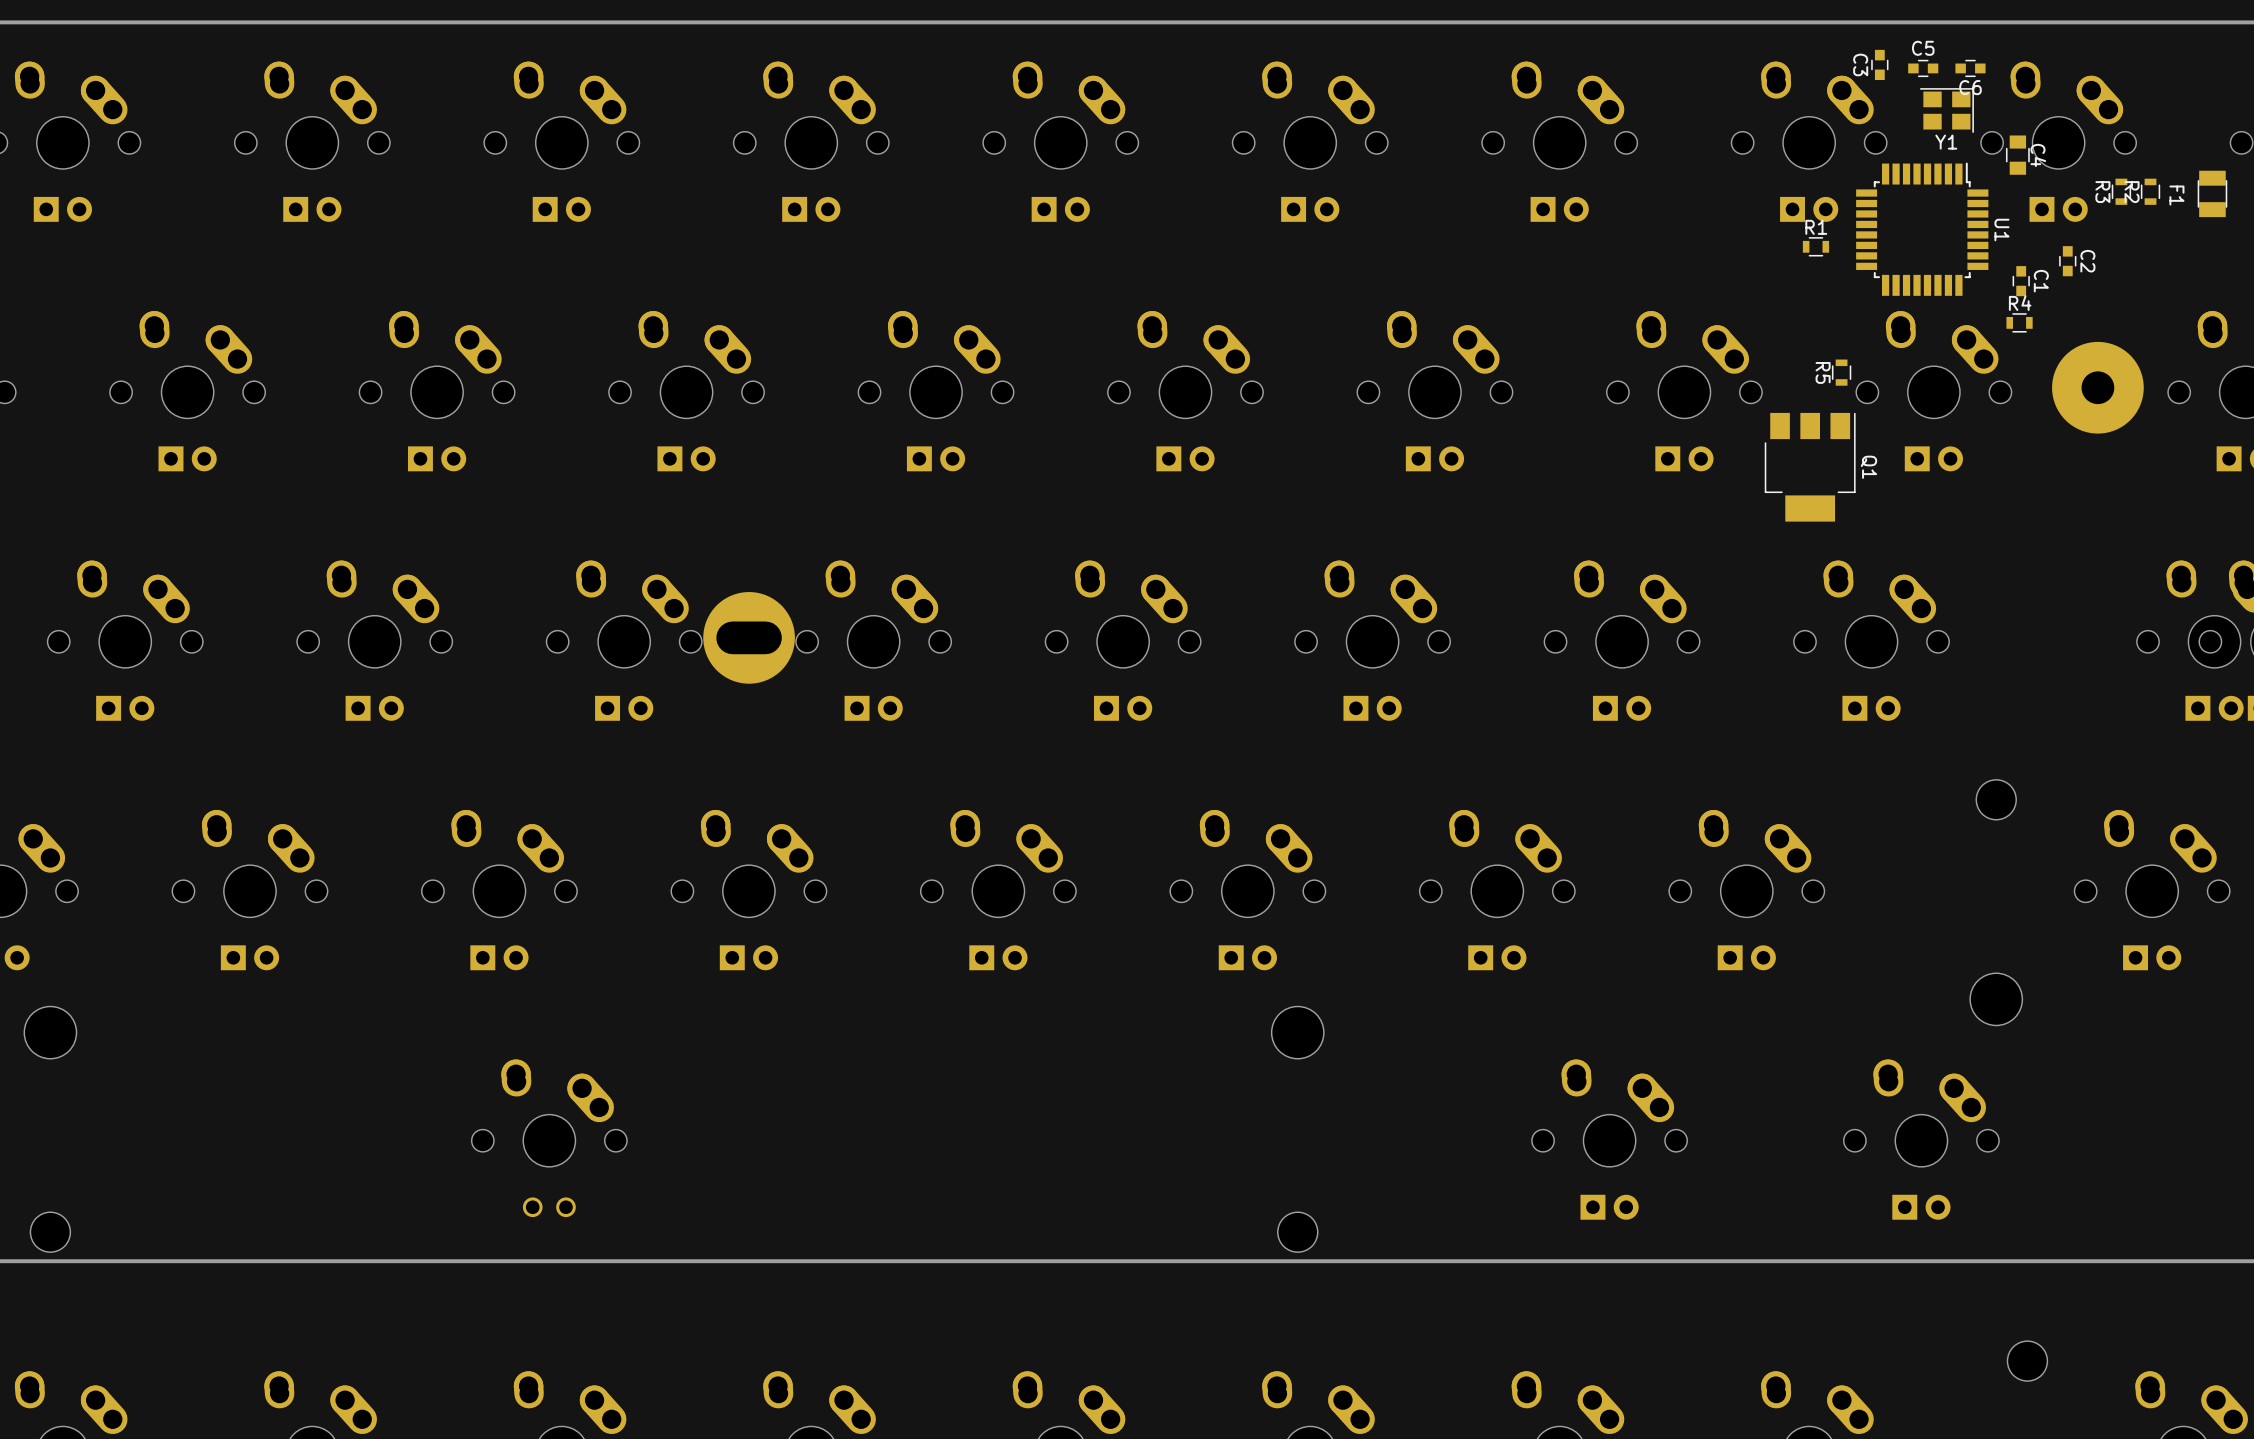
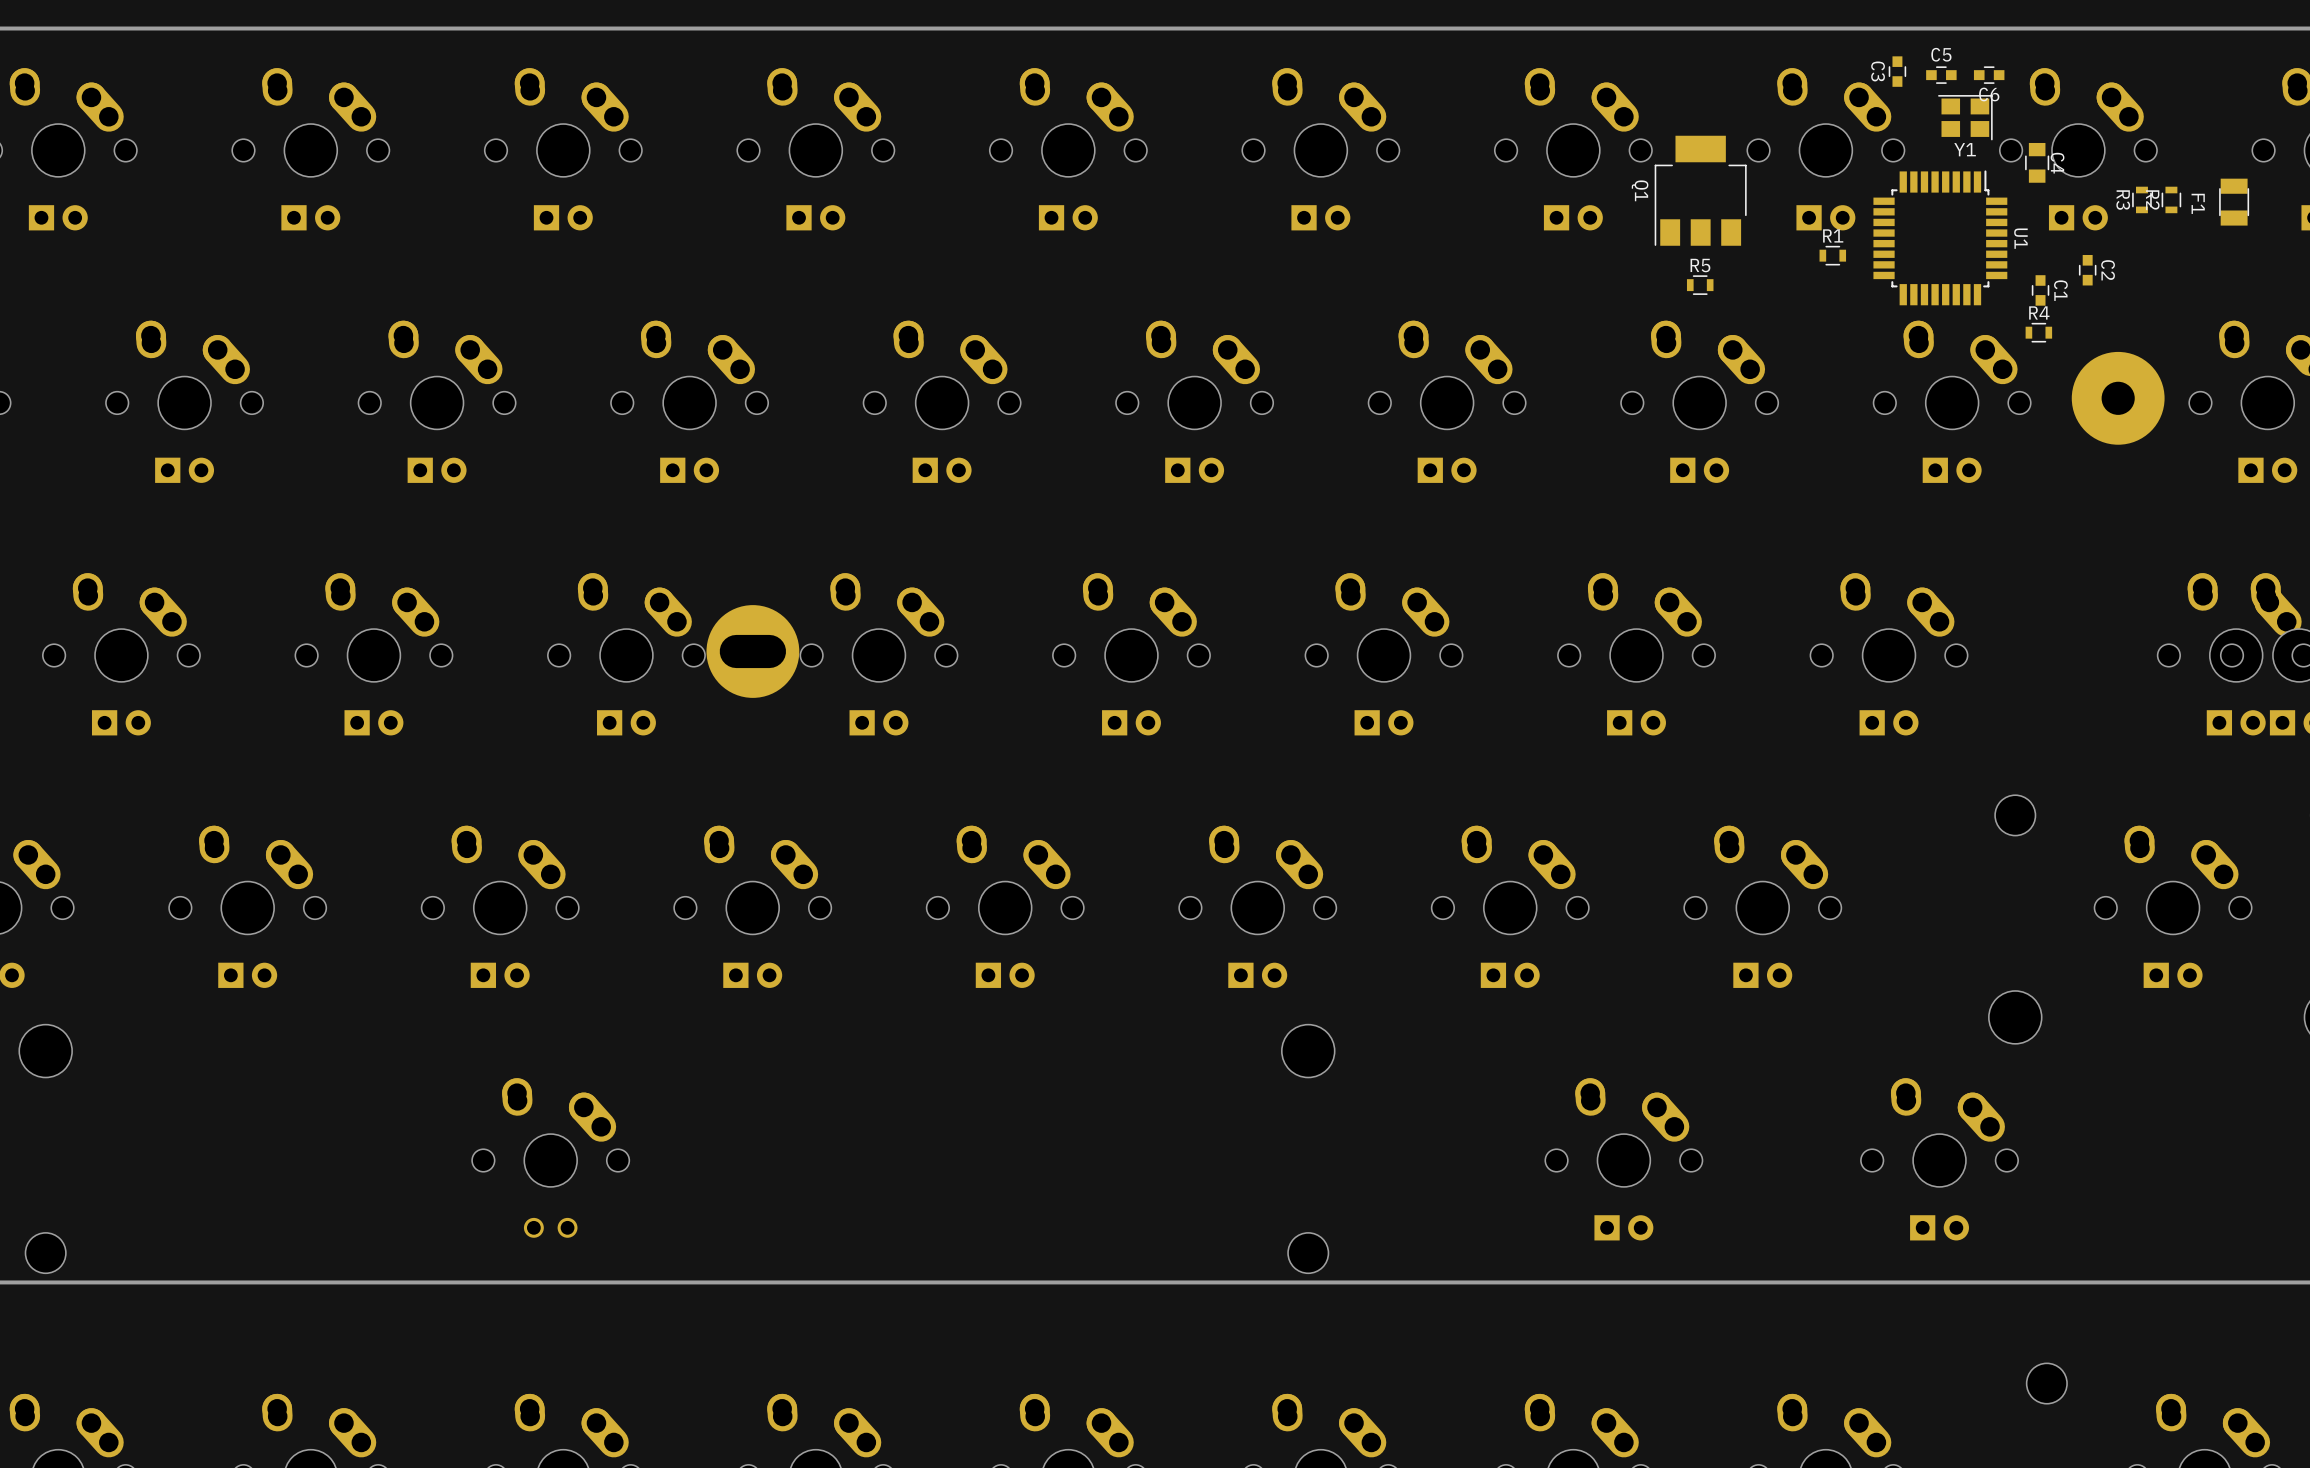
R5 rotation: 0° (1841, 372) -> 90° clockwise (1700, 285)
R5 position: (1841, 372) -> (1700, 285)
Q1 rotation: 0° (1810, 467) -> 180° (1700, 190)
Q1 position: (1810, 467) -> (1700, 190)

